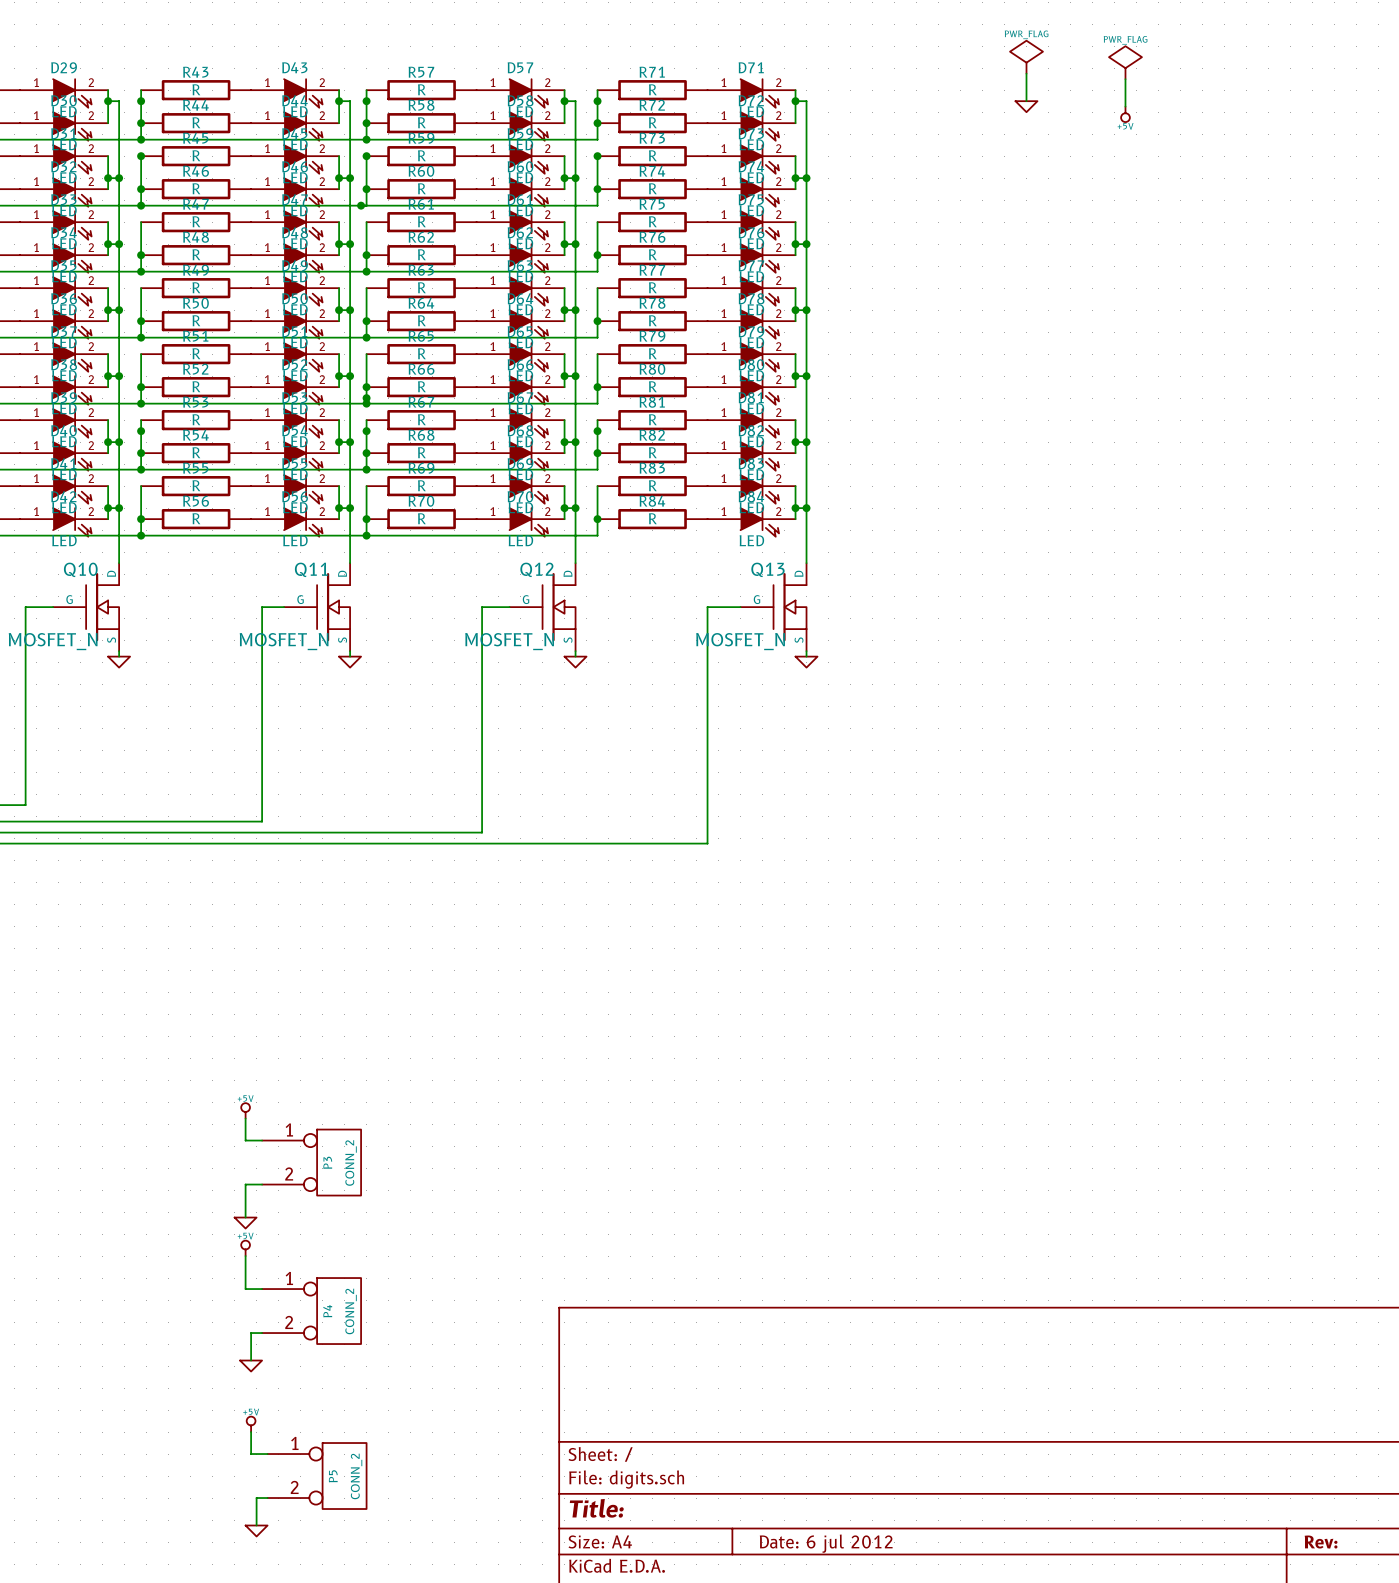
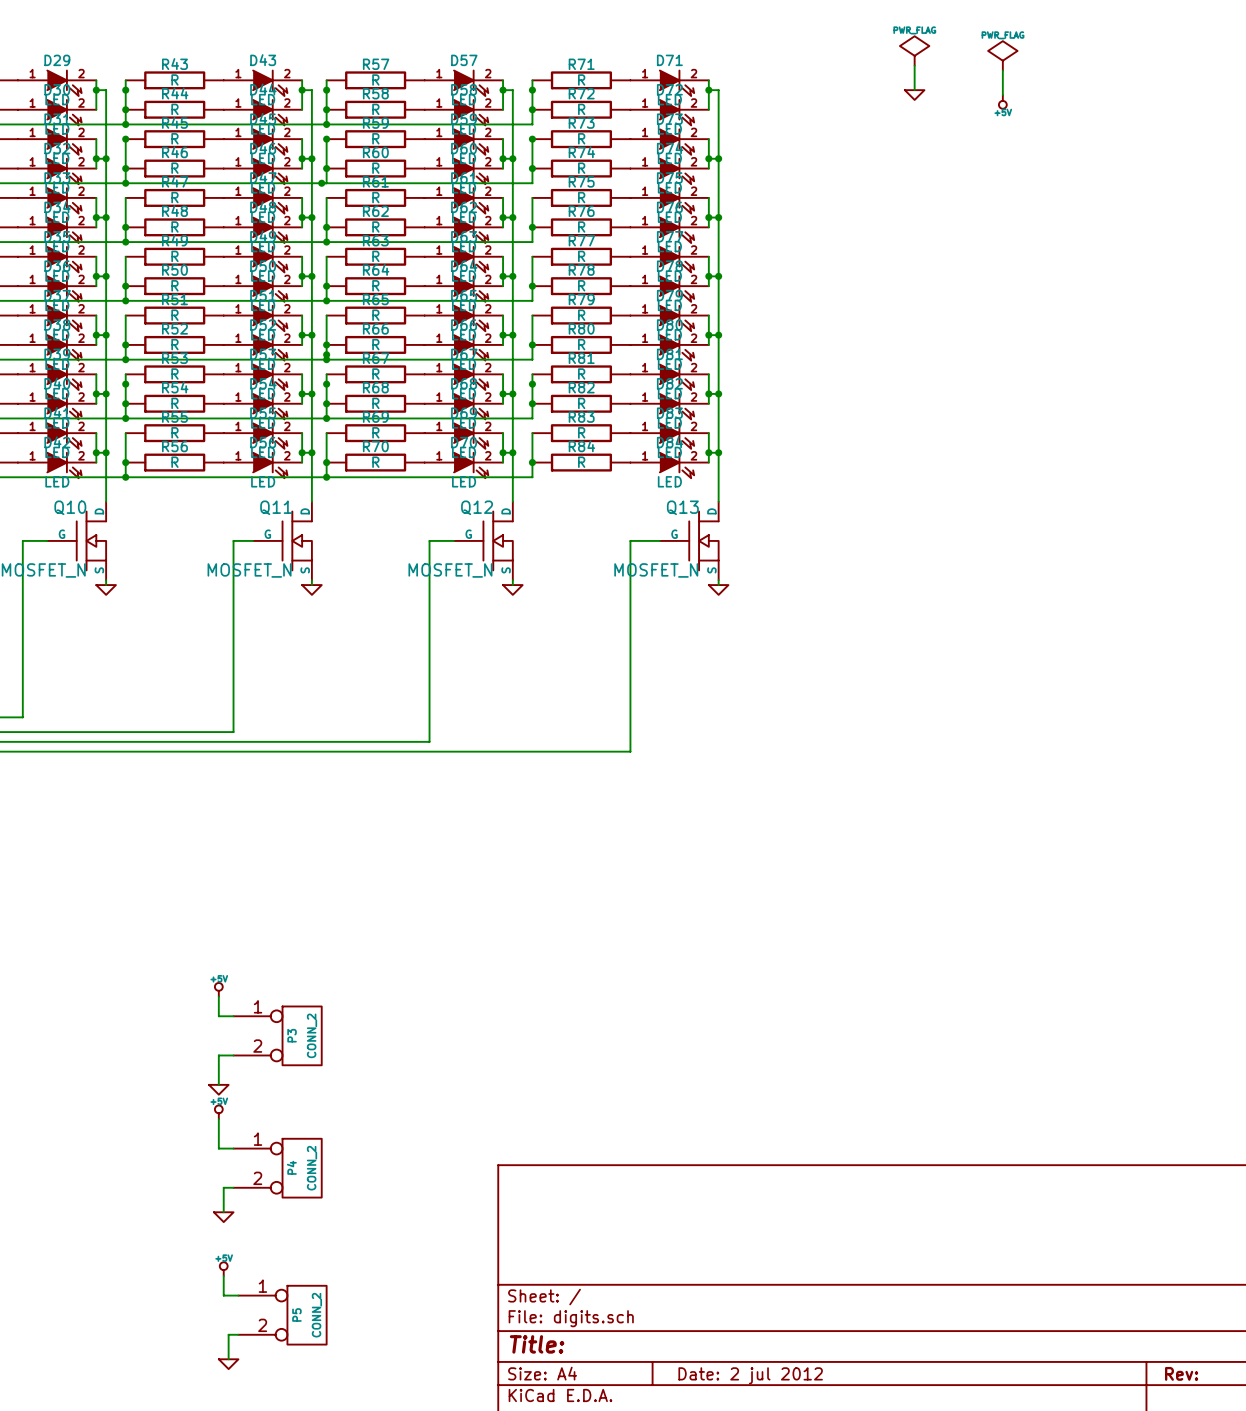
title block: Date: 6 jul 2012 (826, 1543) -> Date: 2 jul 2012 (750, 1375)

